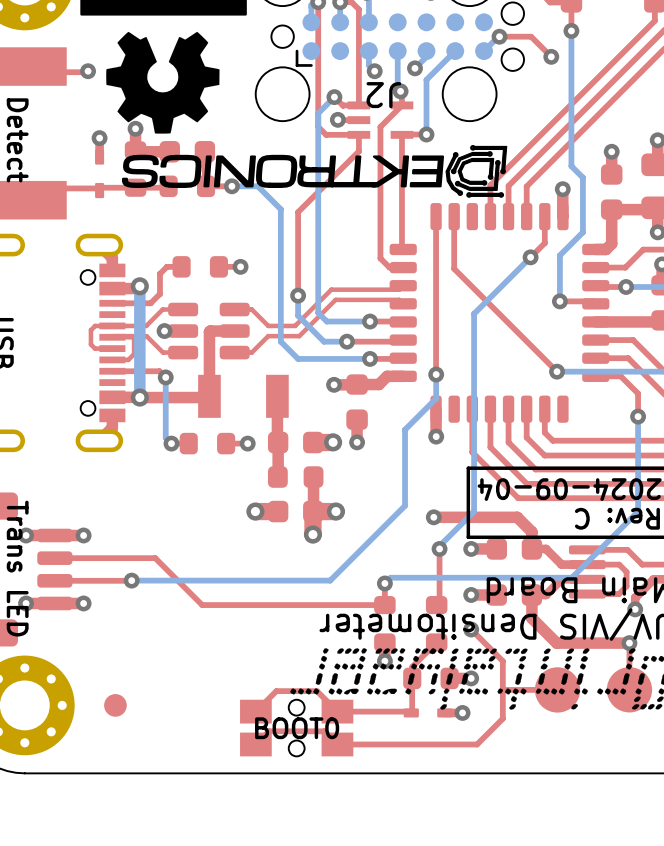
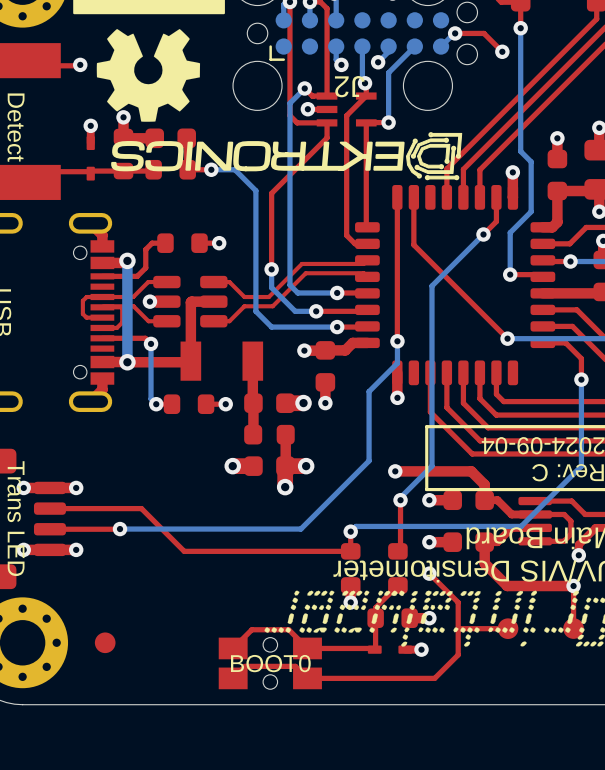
part footprint: [534, 667, 581, 713] -> [497, 618, 519, 640]
part footprint: [606, 667, 653, 713] -> [563, 618, 584, 639]

